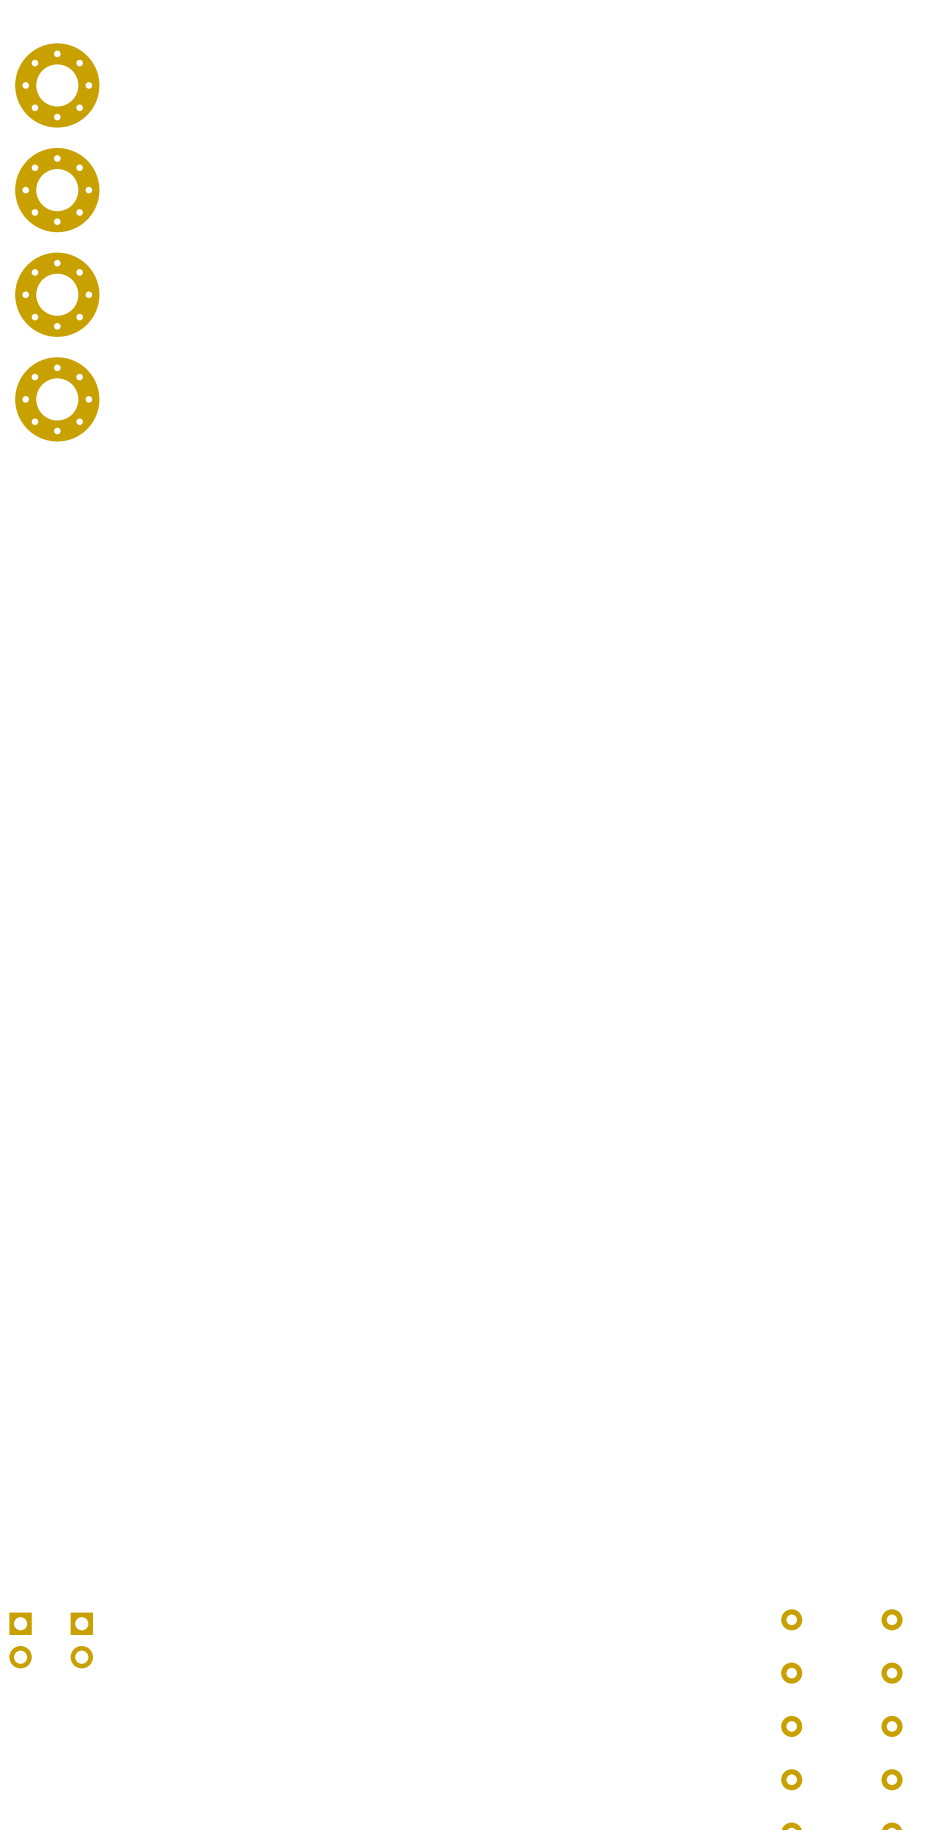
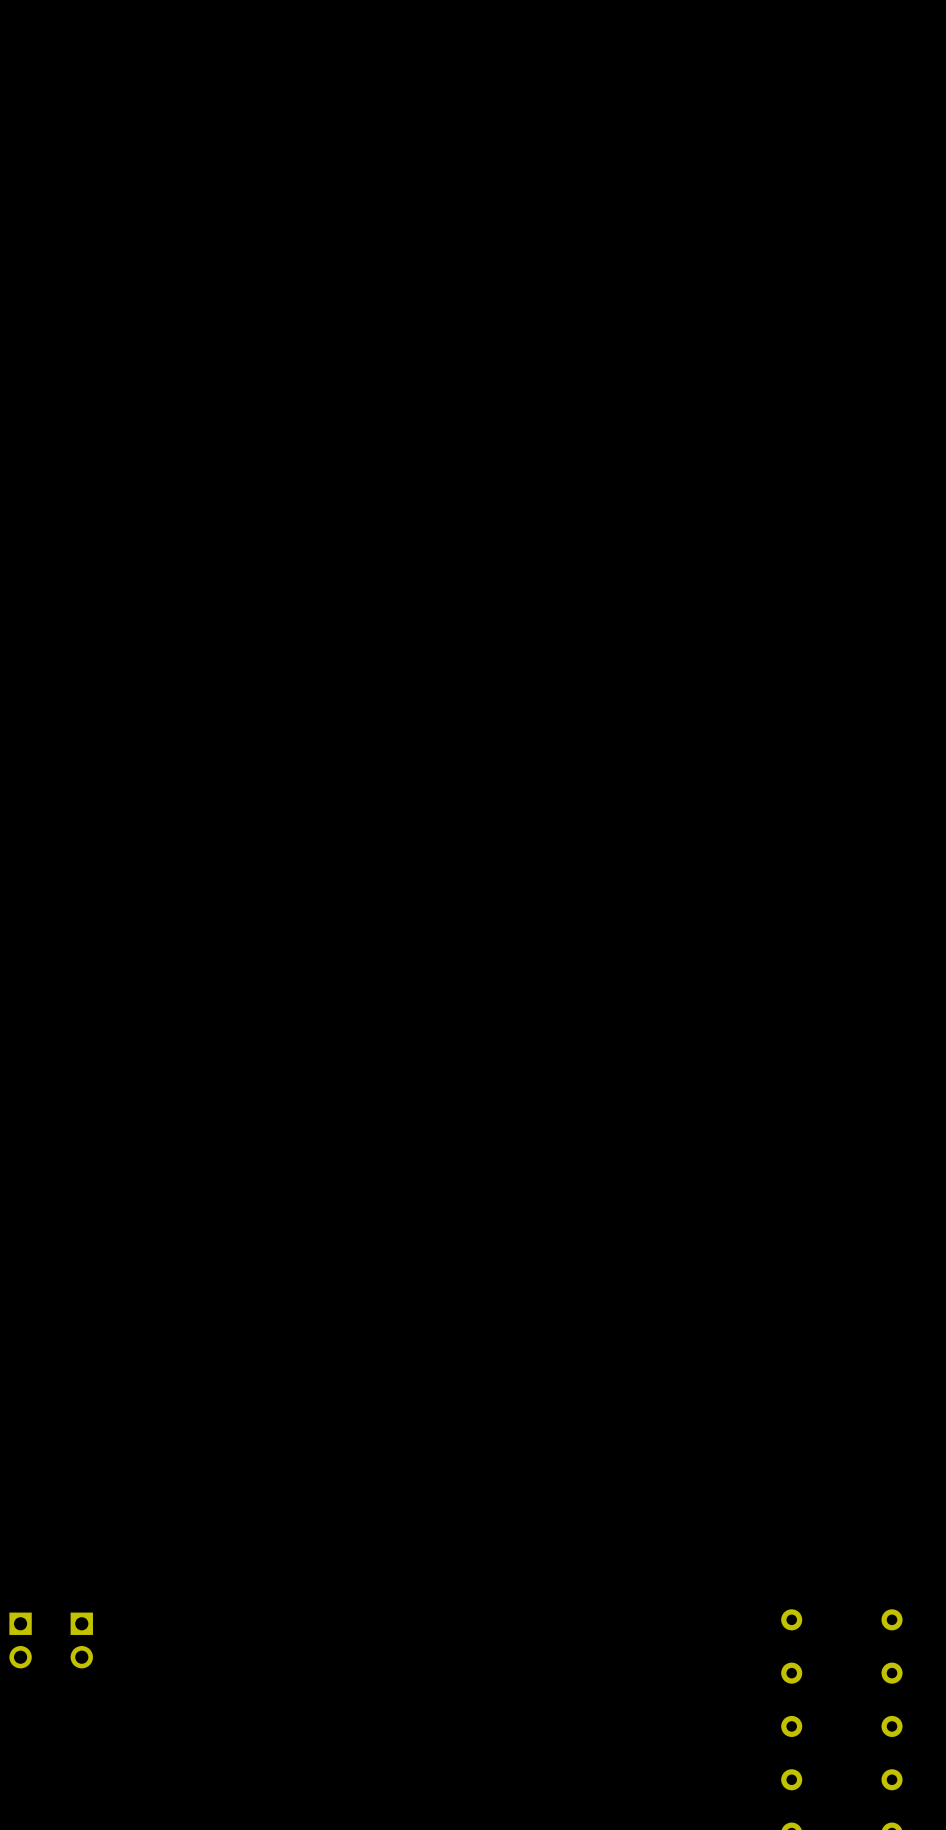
part: (57, 85) -> none
part: (57, 190) -> none
part: (57, 294) -> none
part: (57, 399) -> none

